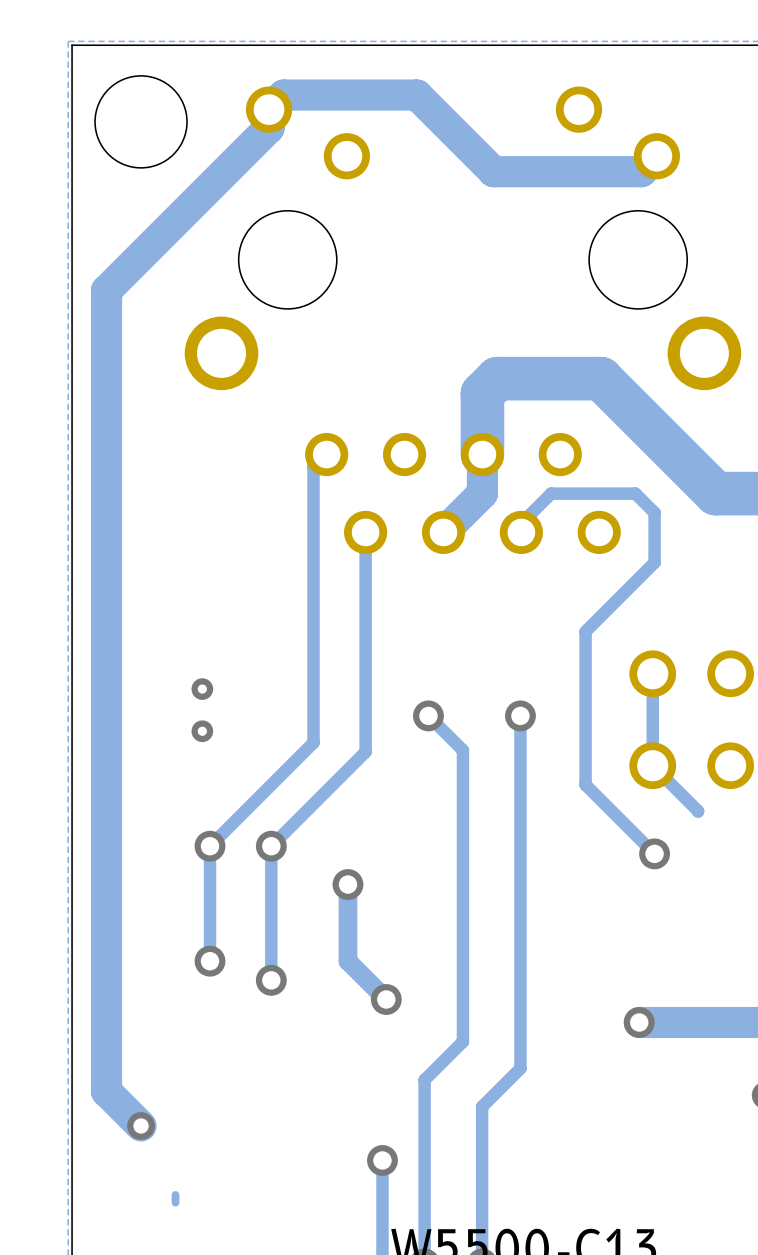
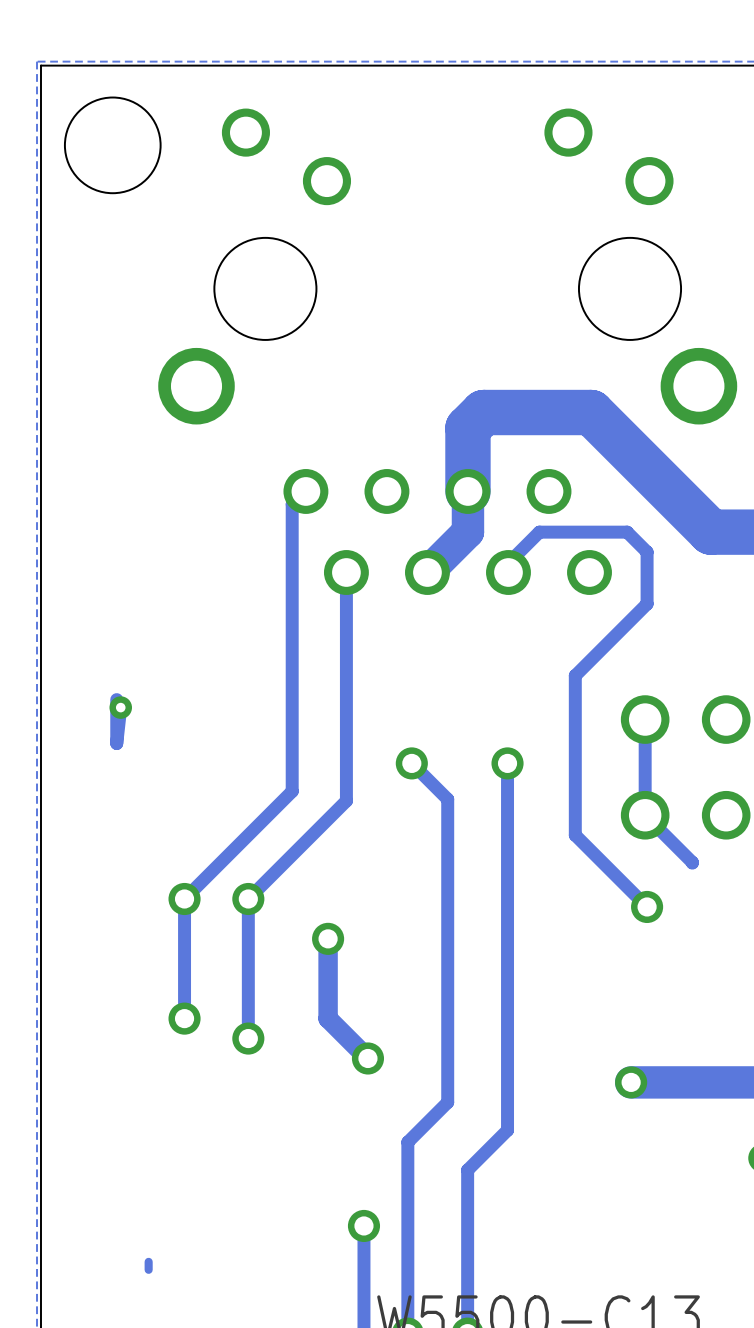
track: (656, 156) (641, 171) (493, 171) (416, 95) (283, 95) (269, 109) (269, 128) (106, 290) (106, 1091) (141, 1125) -> none
track: none -> (116, 699) (116, 743) (120, 707)
via: none -> (120, 707)
via: (202, 689) -> none
via: (202, 731) -> none
via: (141, 1125) -> none

